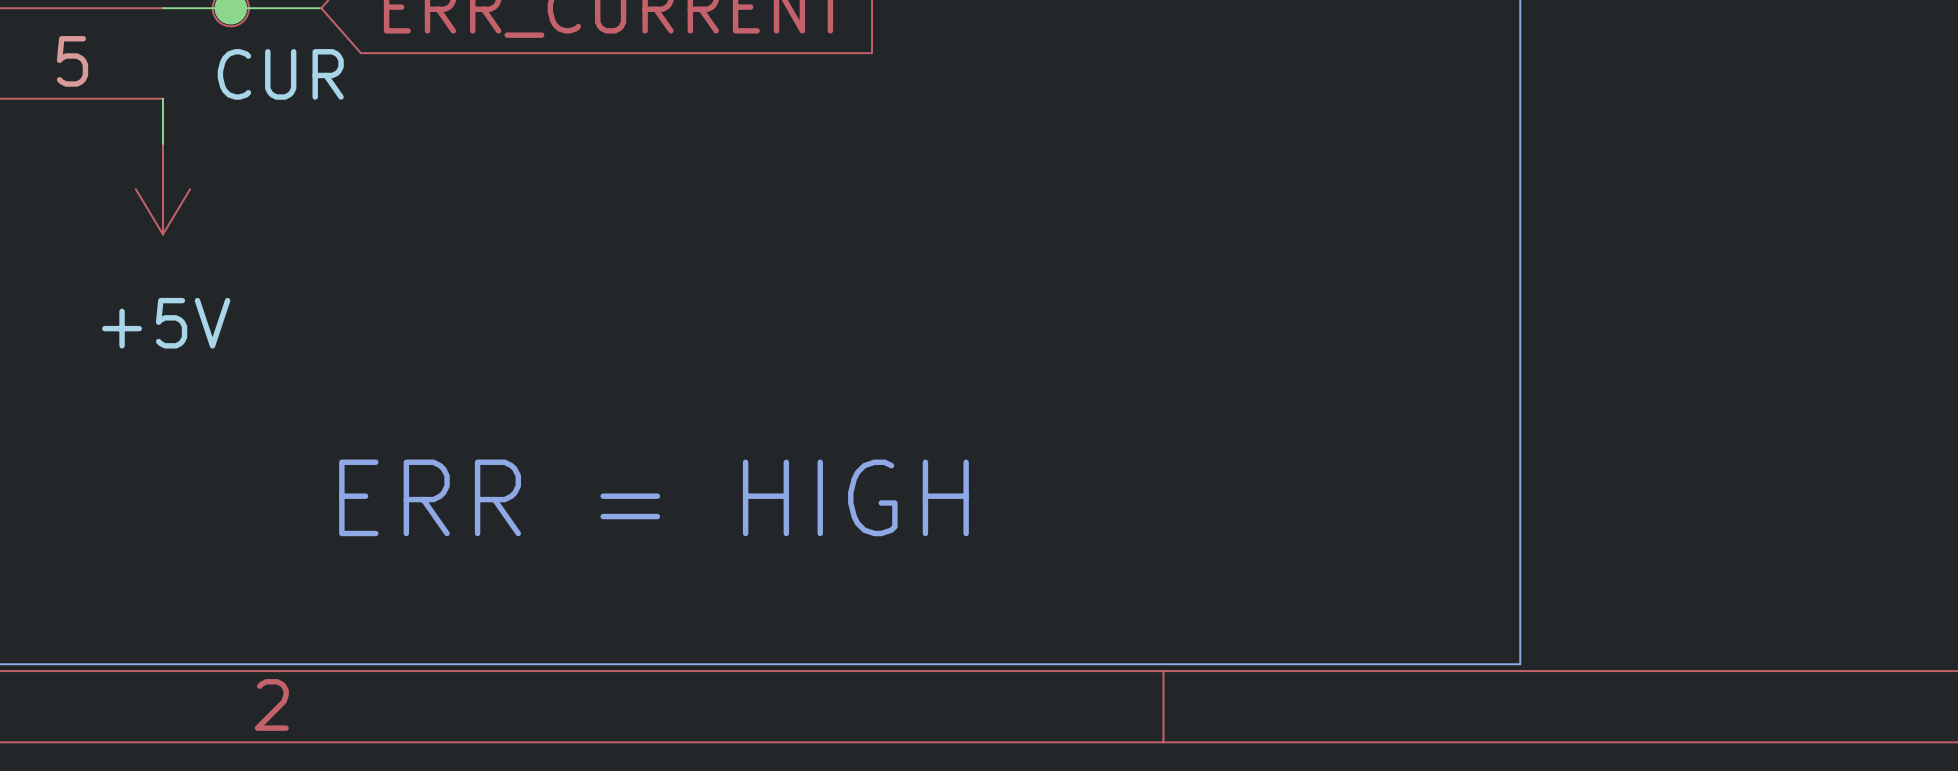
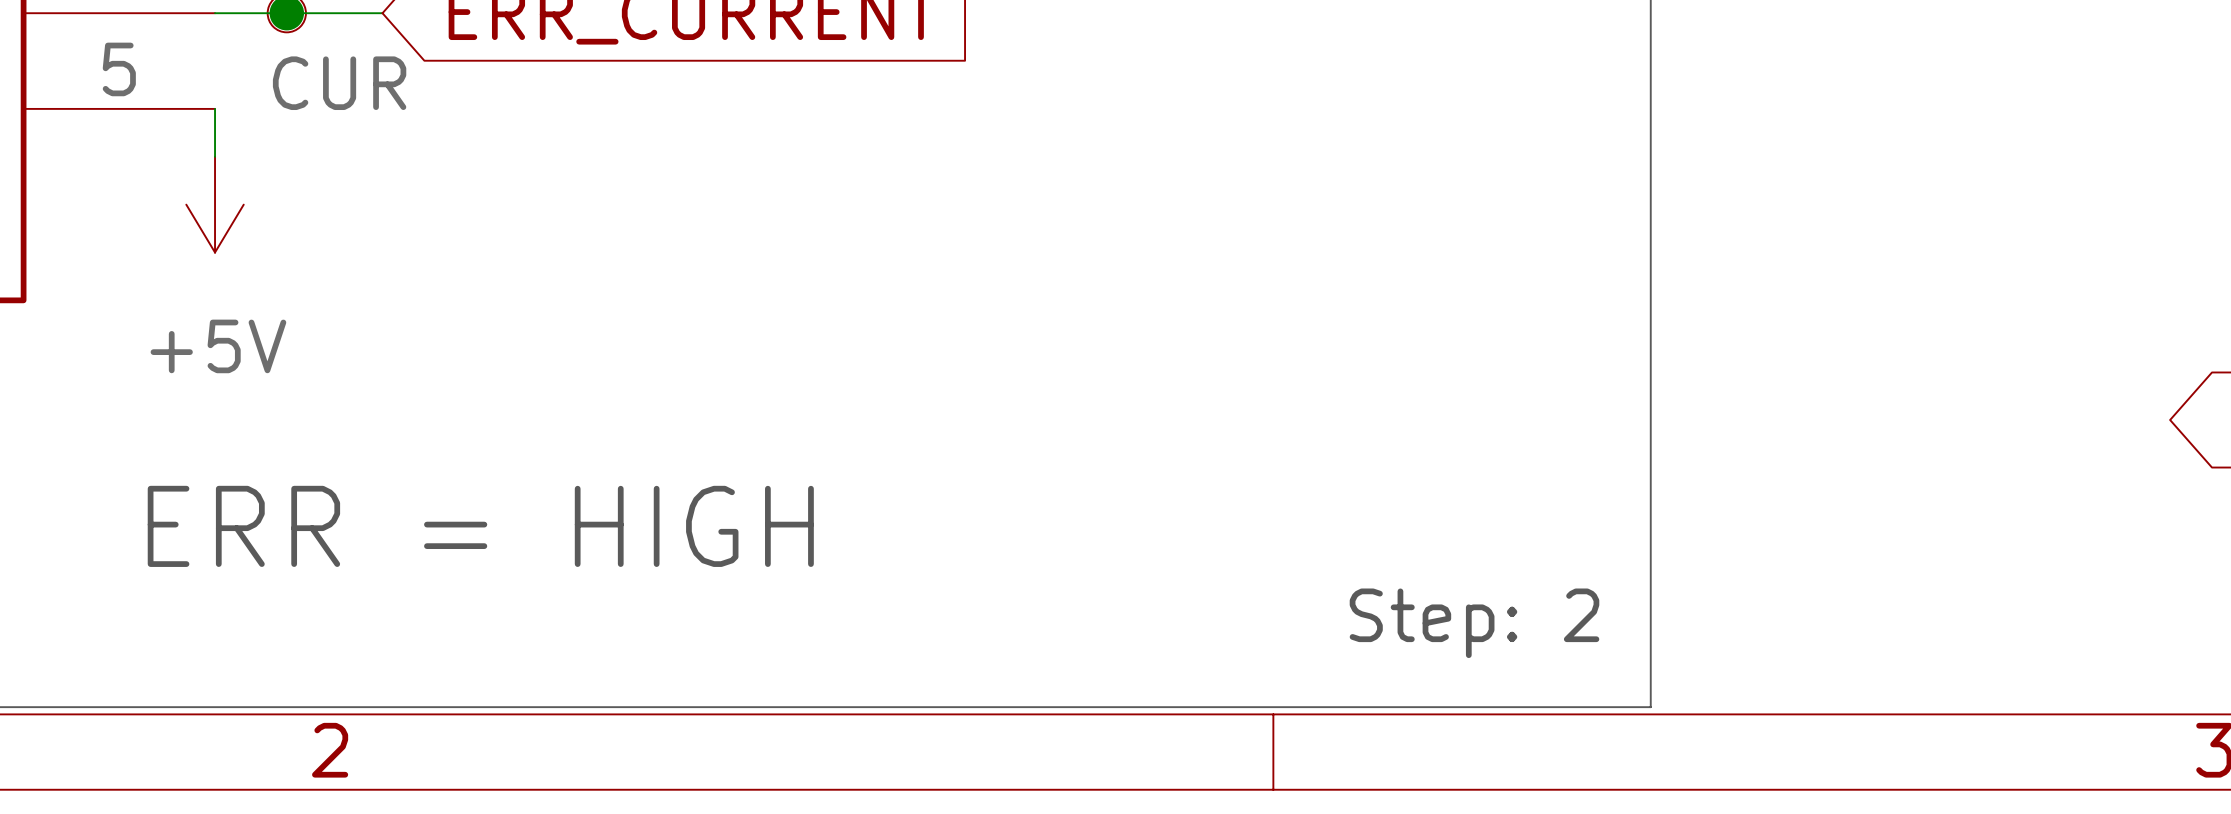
text position: ERR = HIGH (654, 497) -> ERR = HIGH (480, 526)
text: none -> Step: 2 (1474, 623)

